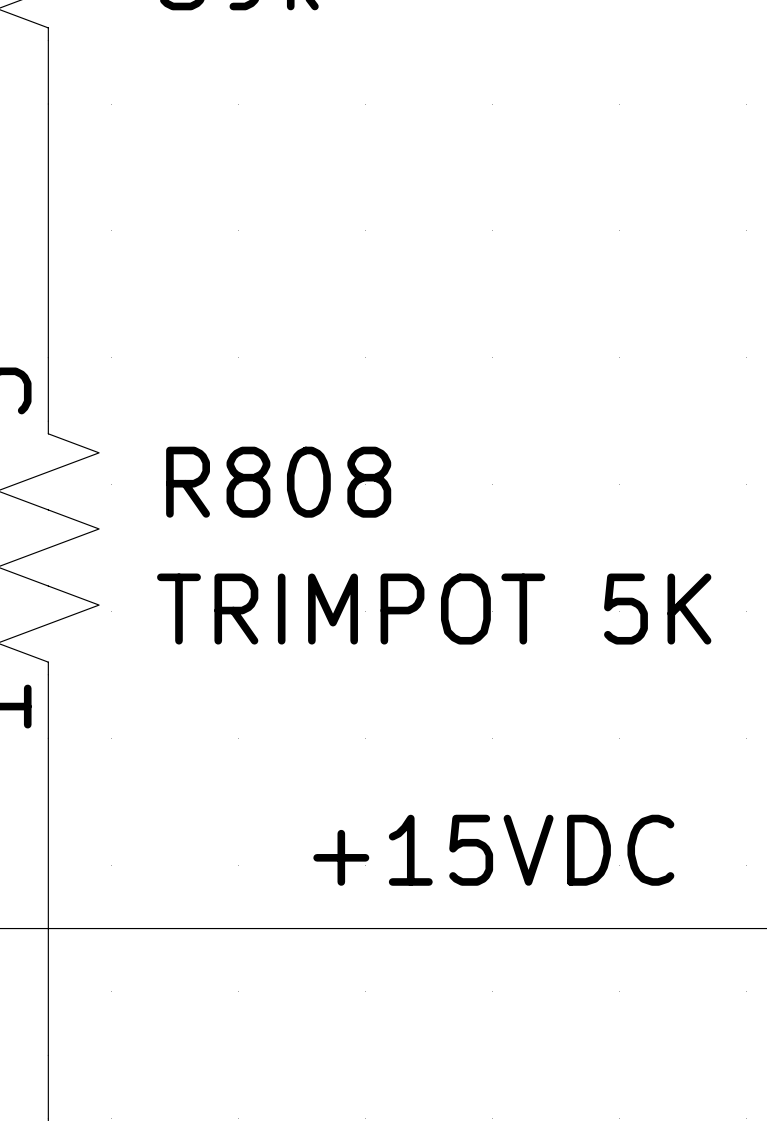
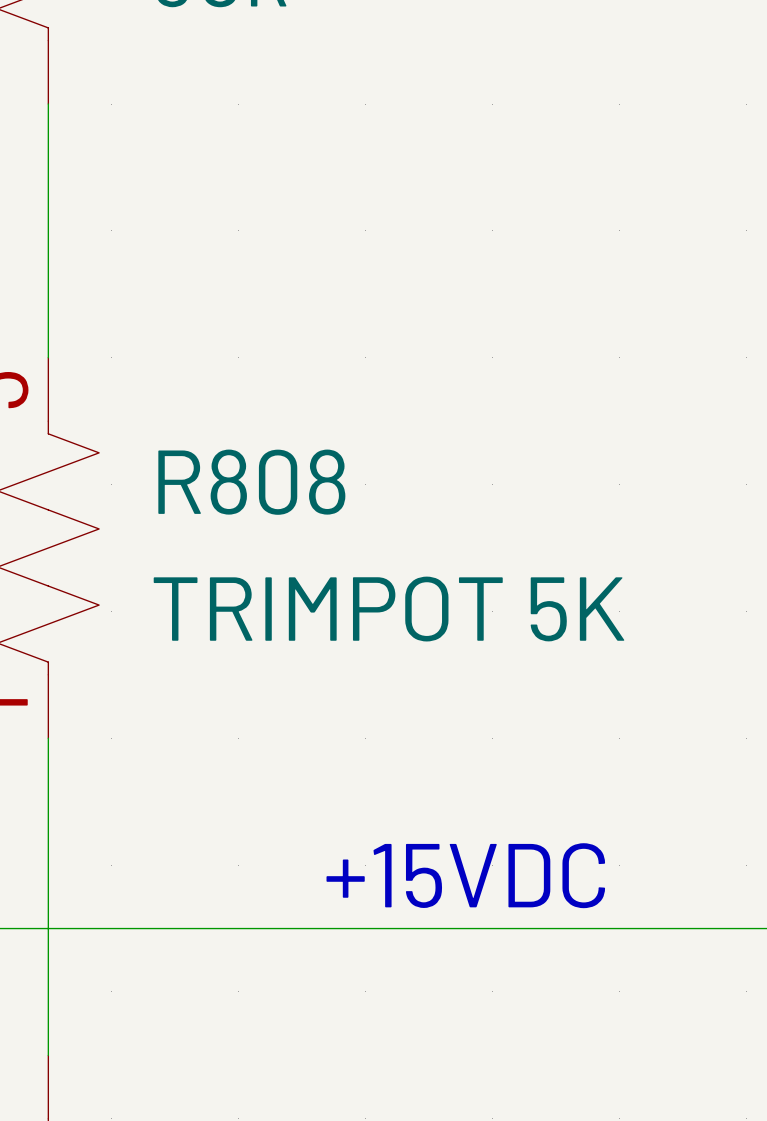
text position: +15VDC (493, 850) -> +15VDC (465, 875)

